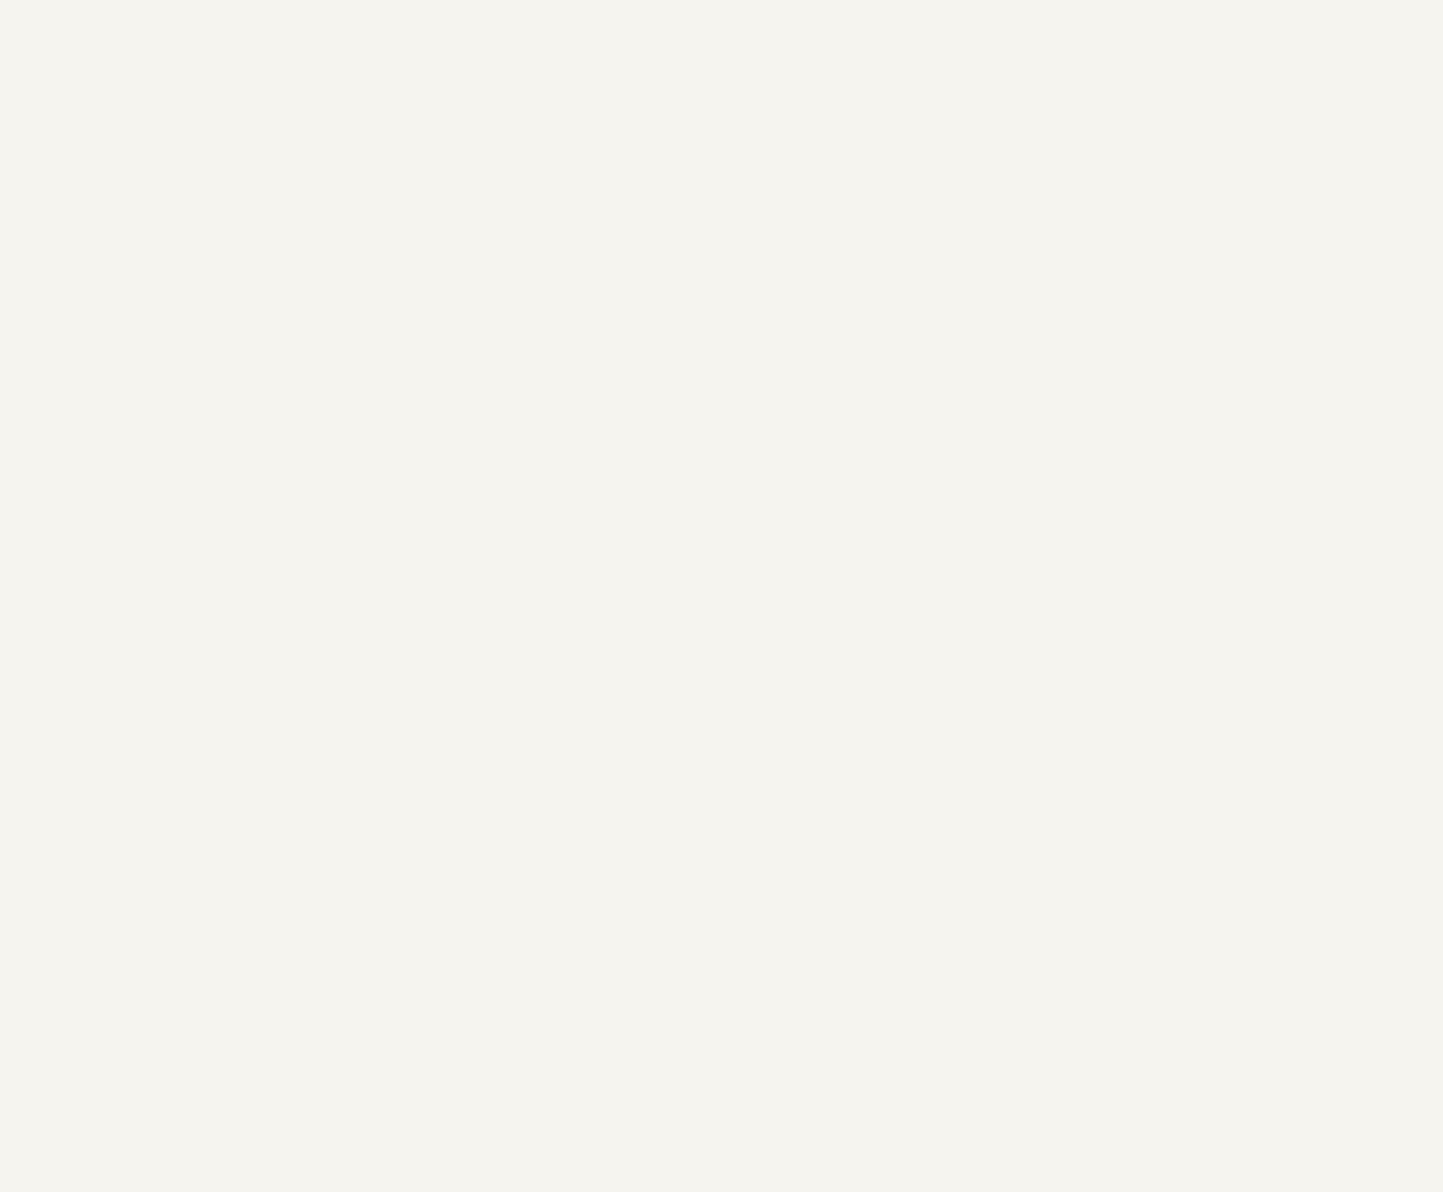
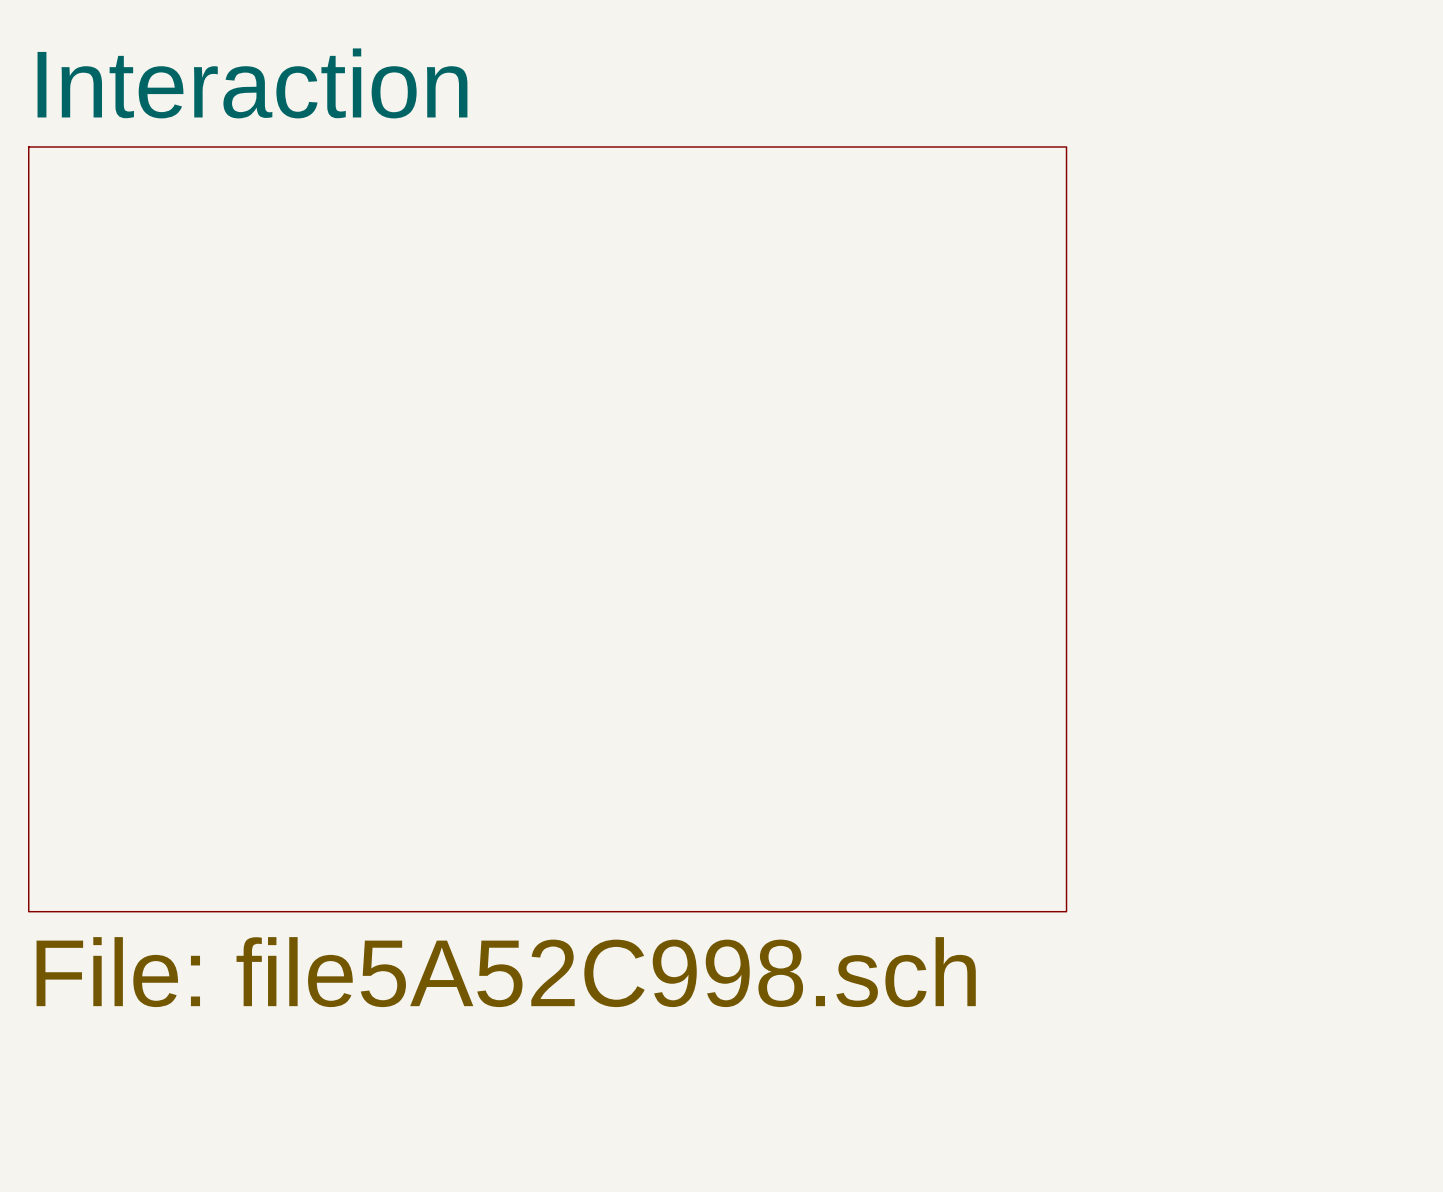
sheet Interaction: none -> File: file5A52C998.sch (547, 529)

